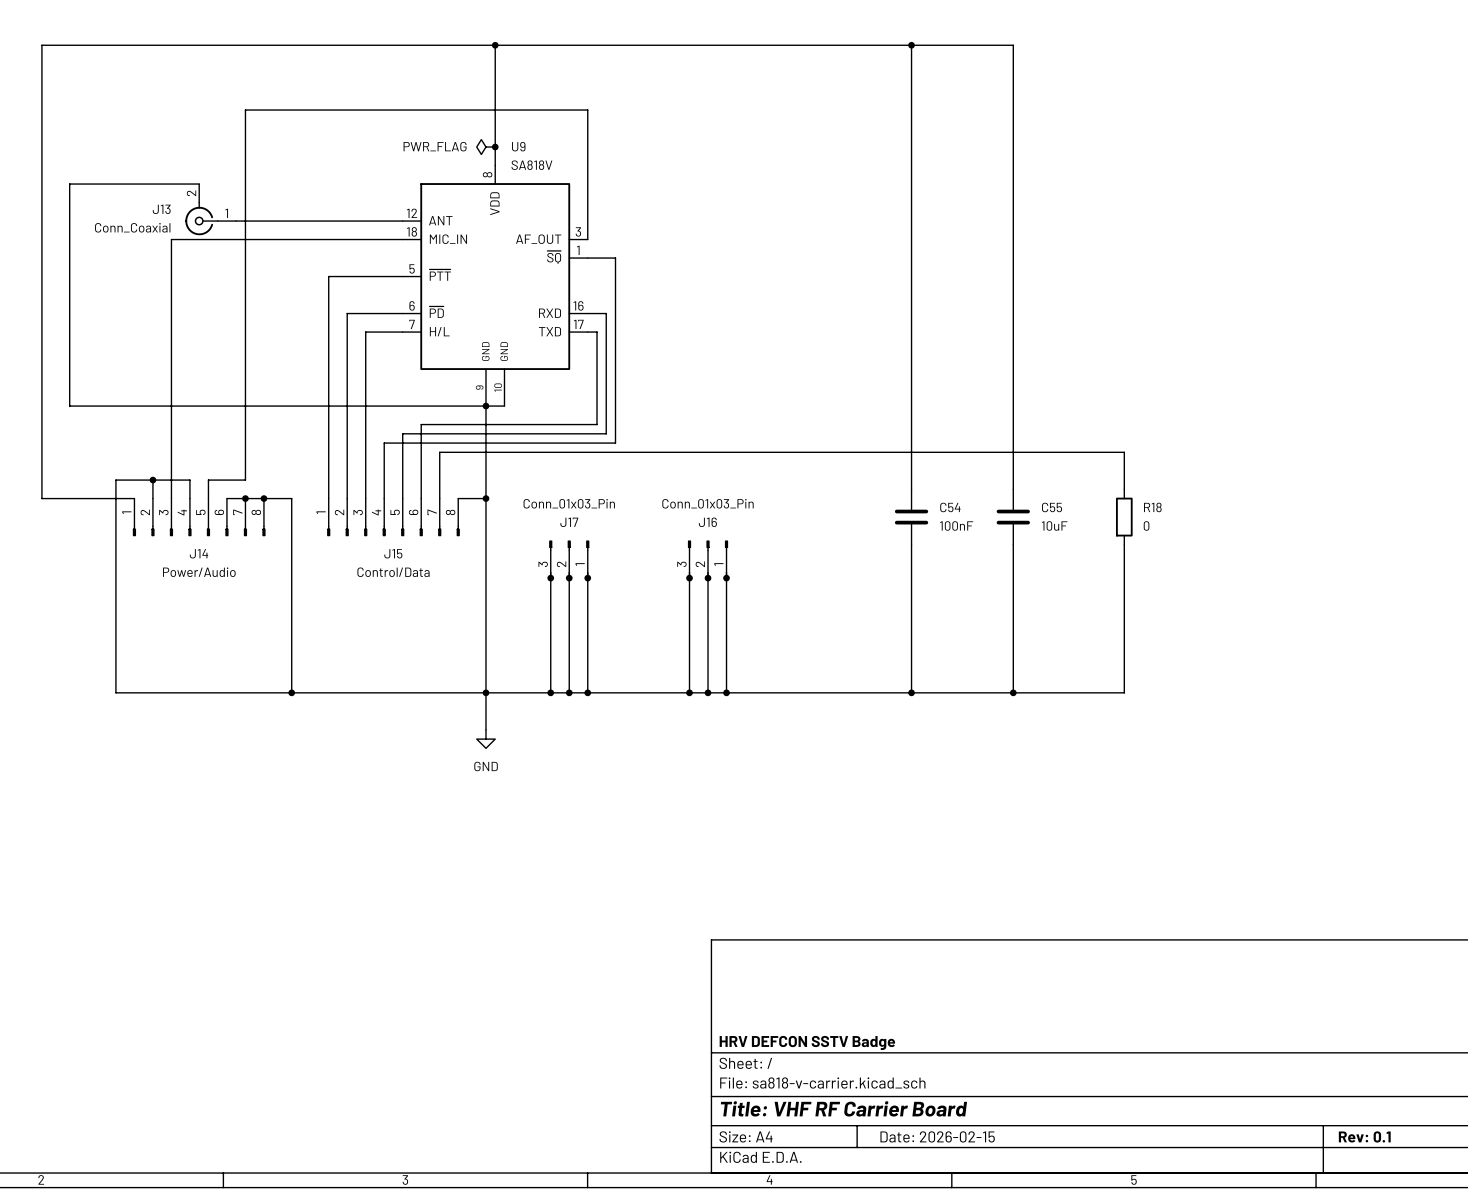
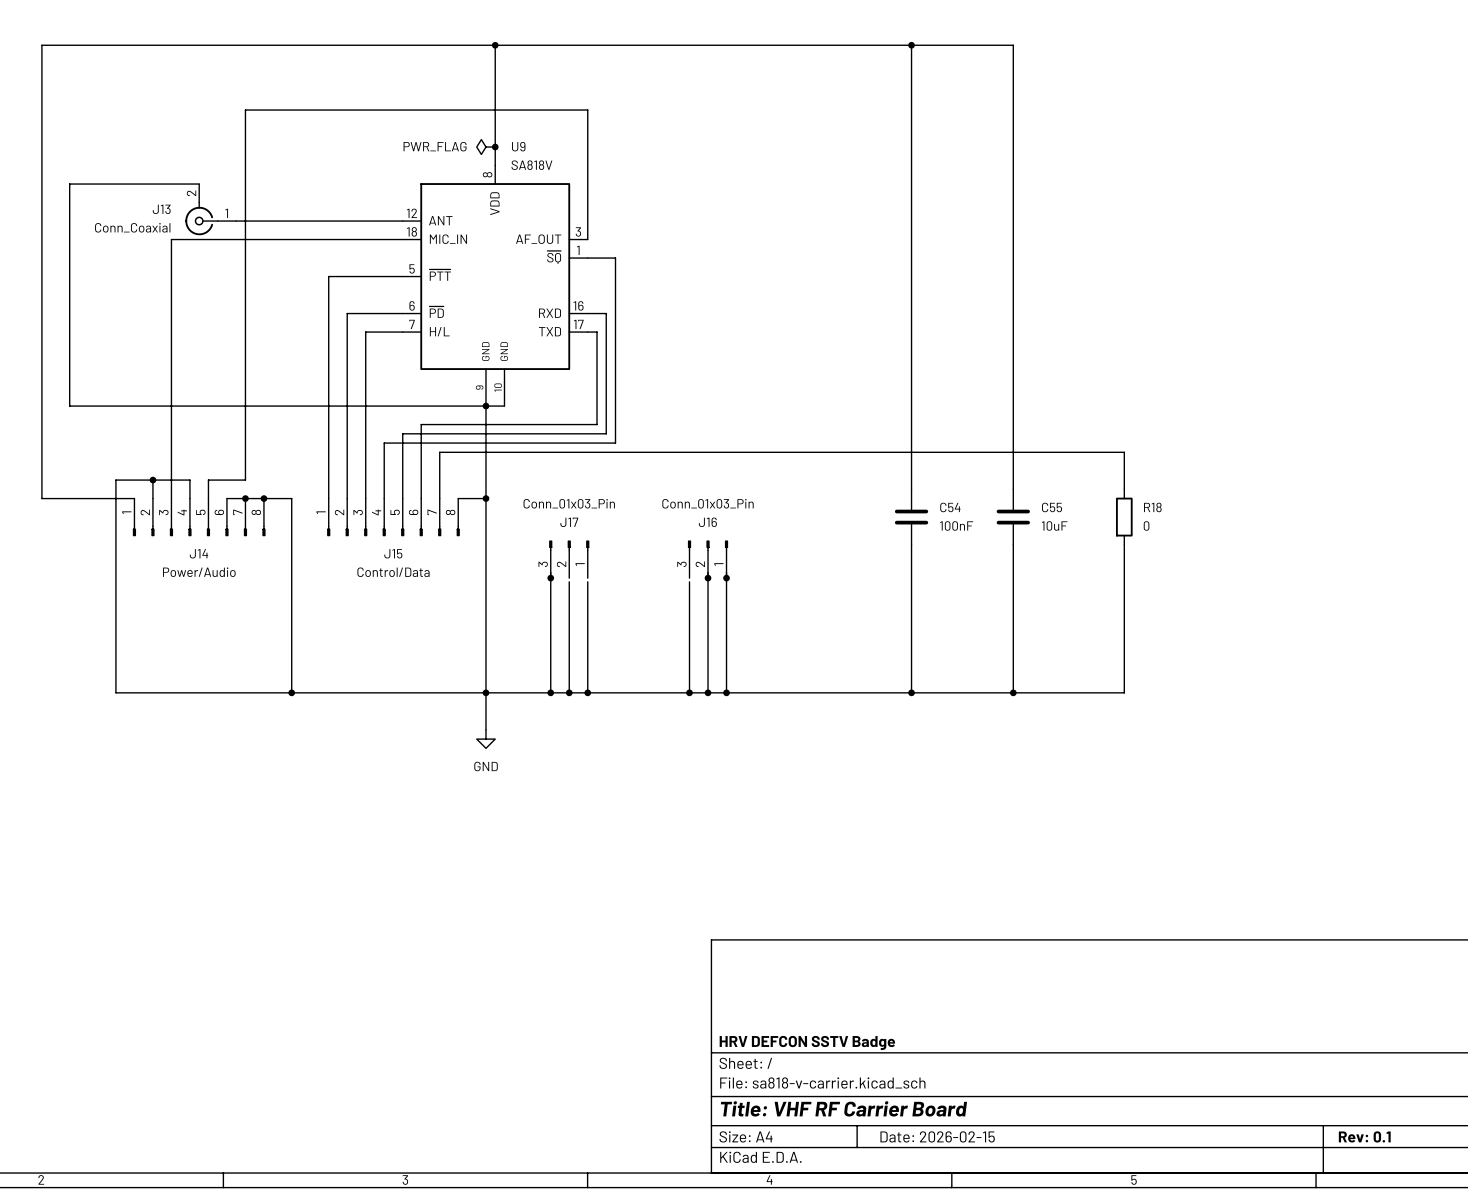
junction: (569, 578) -> none
junction: (587, 578) -> none
junction: (689, 578) -> none

